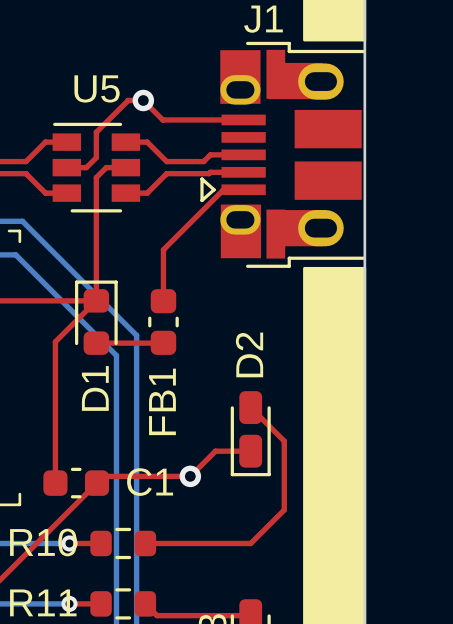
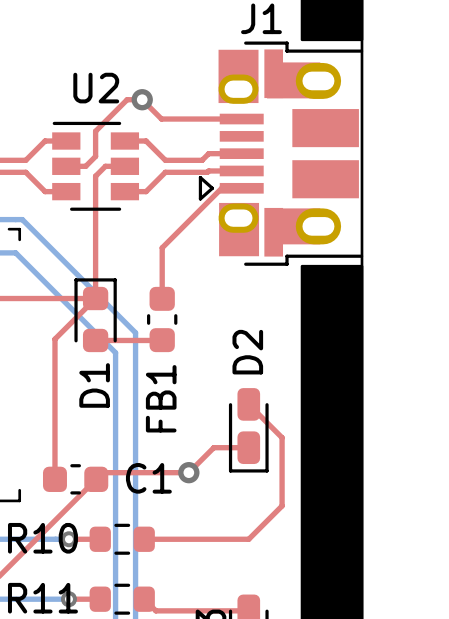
U5 name: U5 (97, 88) -> U2 (96, 88)

